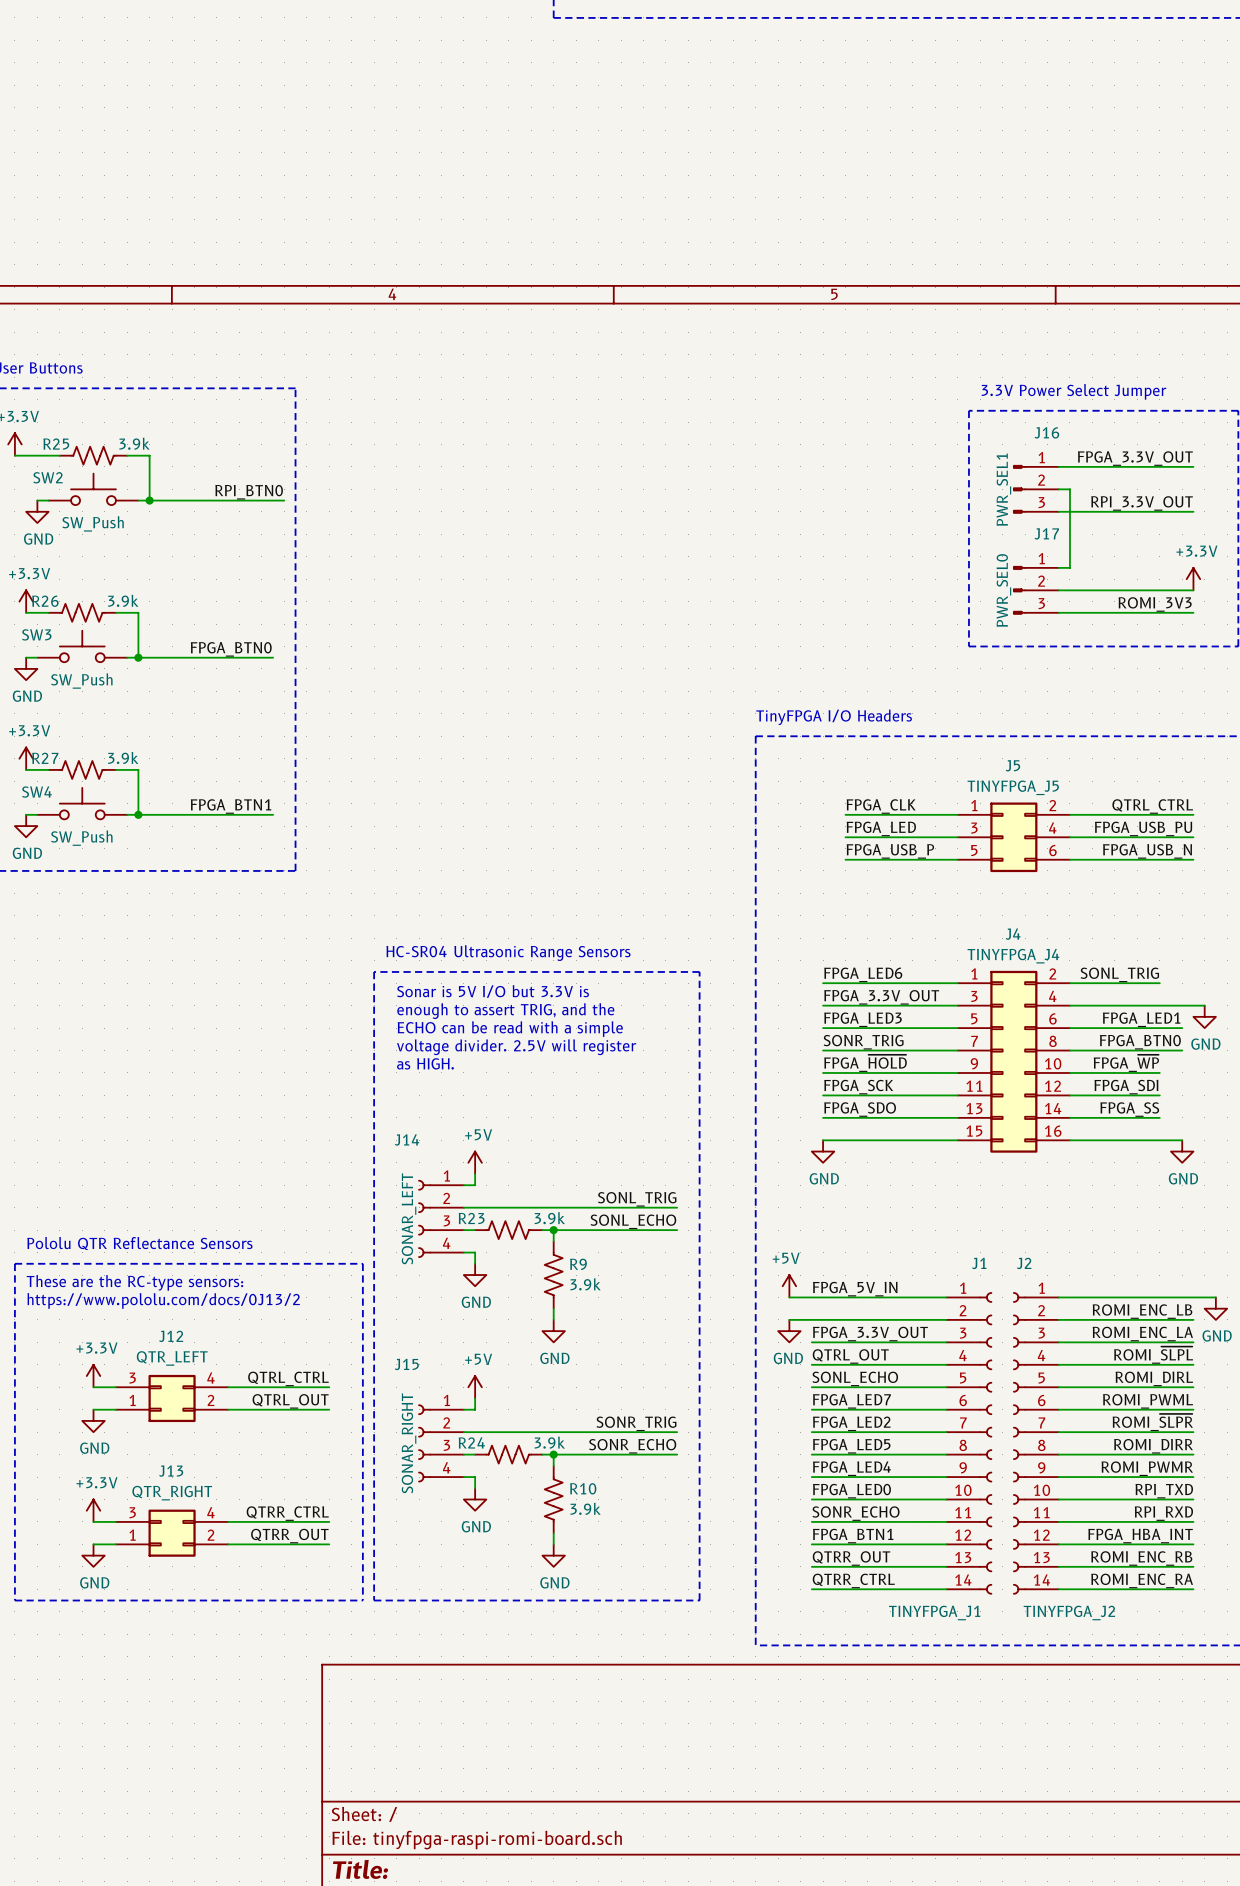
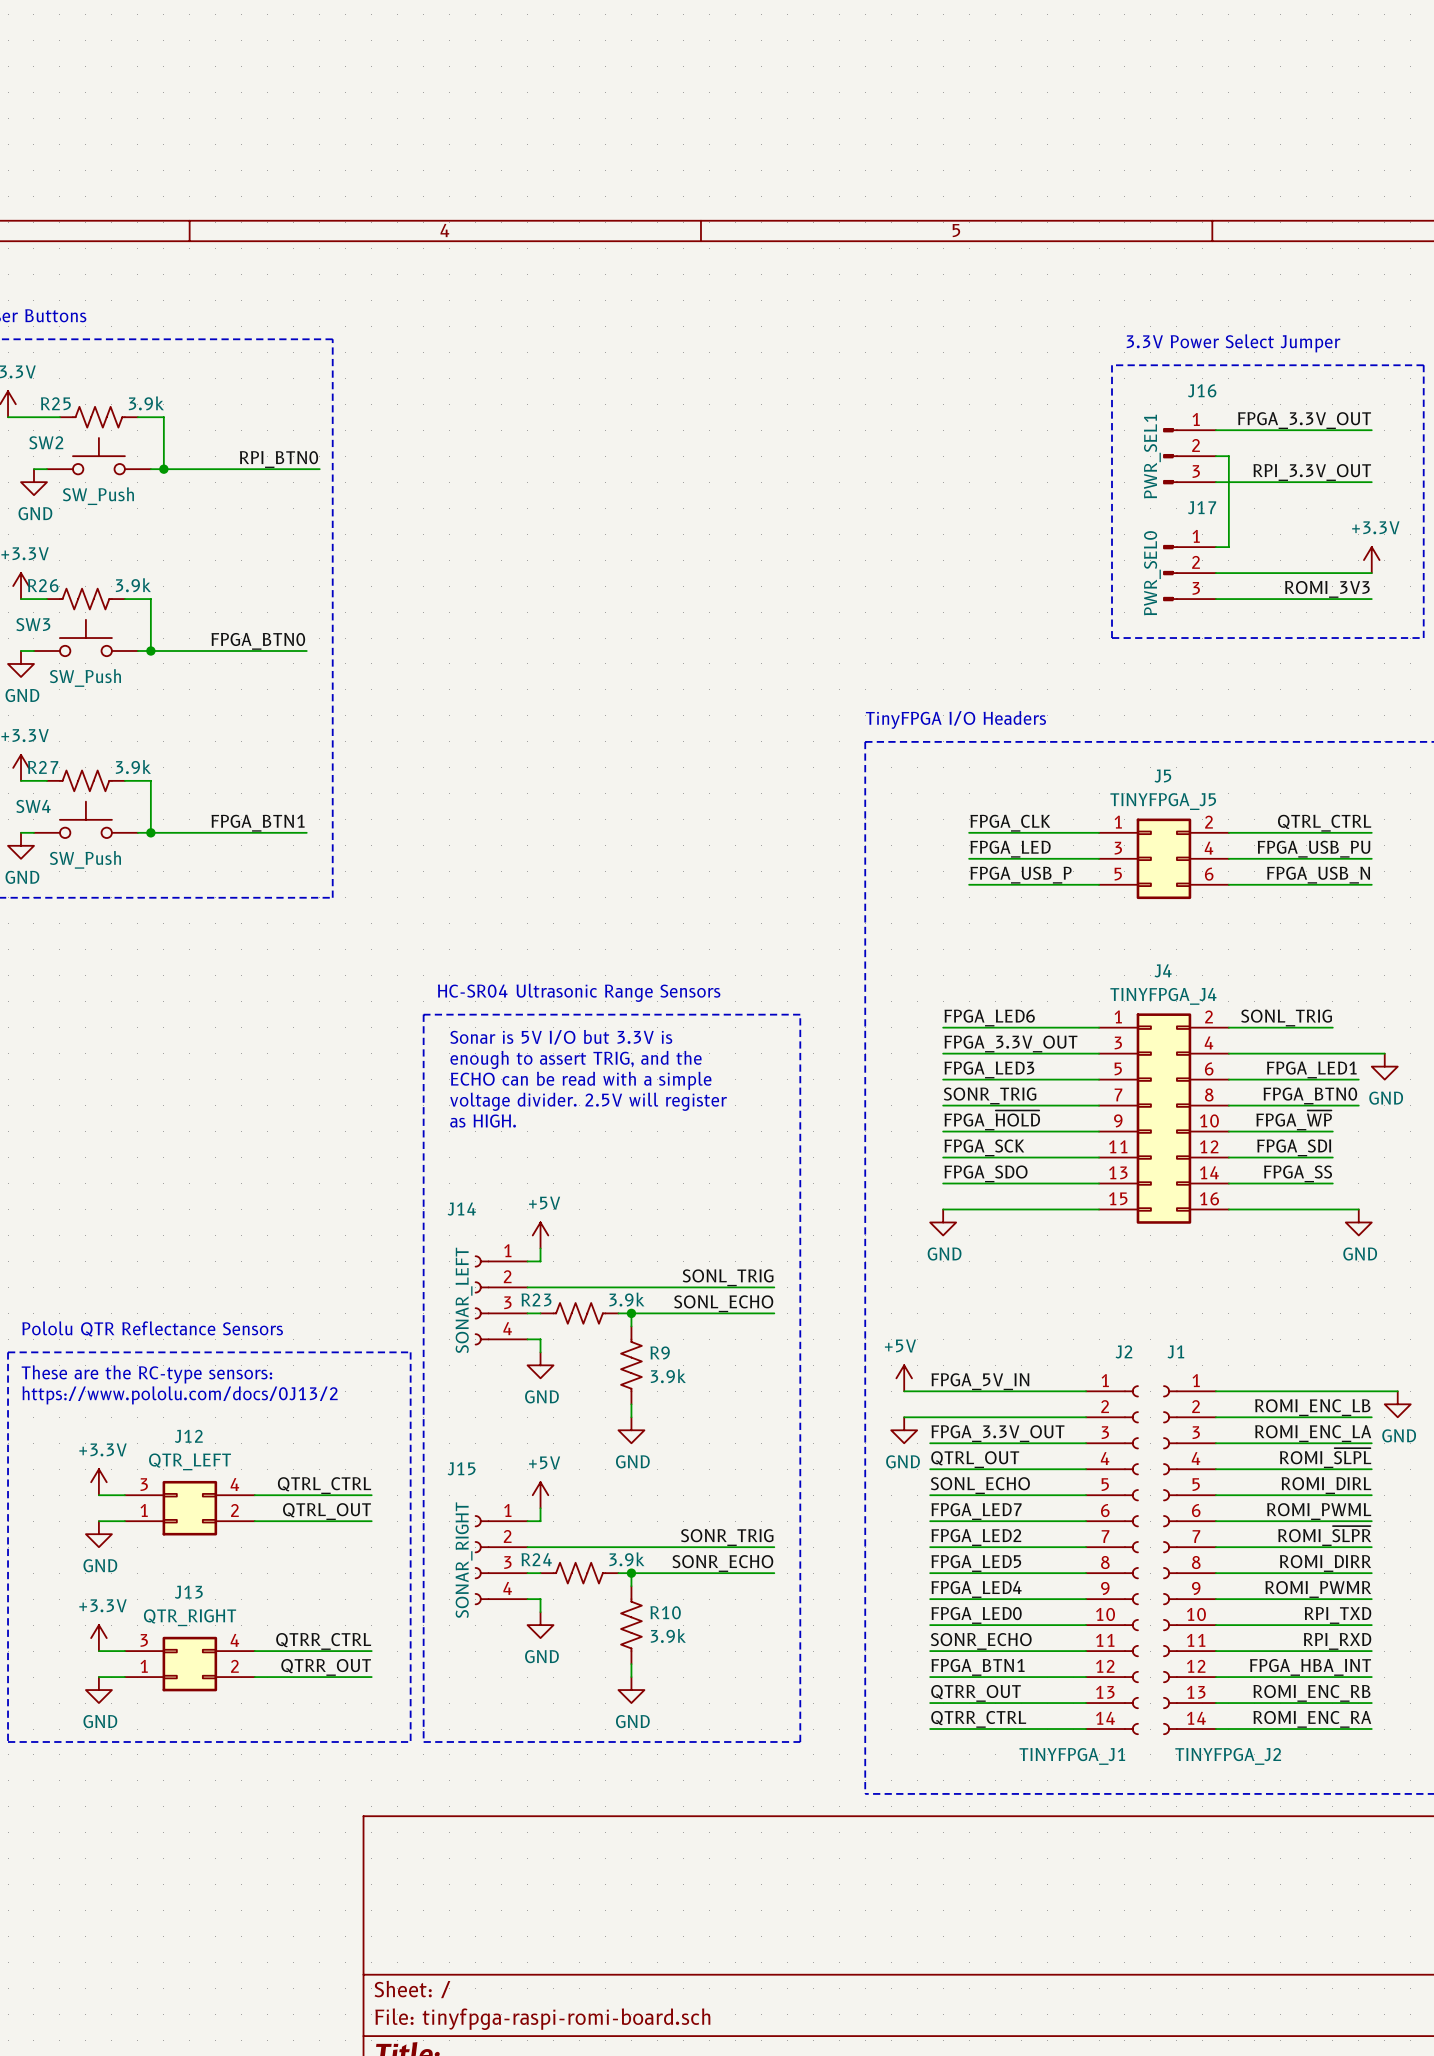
J1 name: J1 (979, 1263) -> J2 (1123, 1351)
J2 name: J2 (1024, 1263) -> J1 (1175, 1351)

